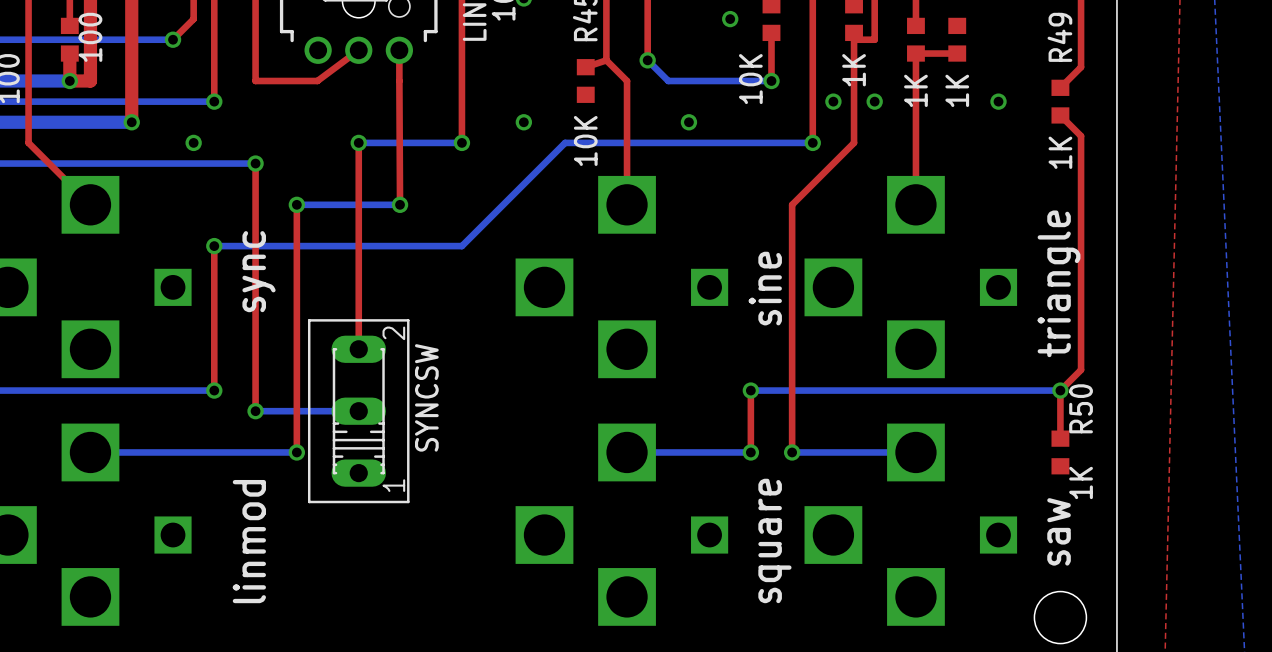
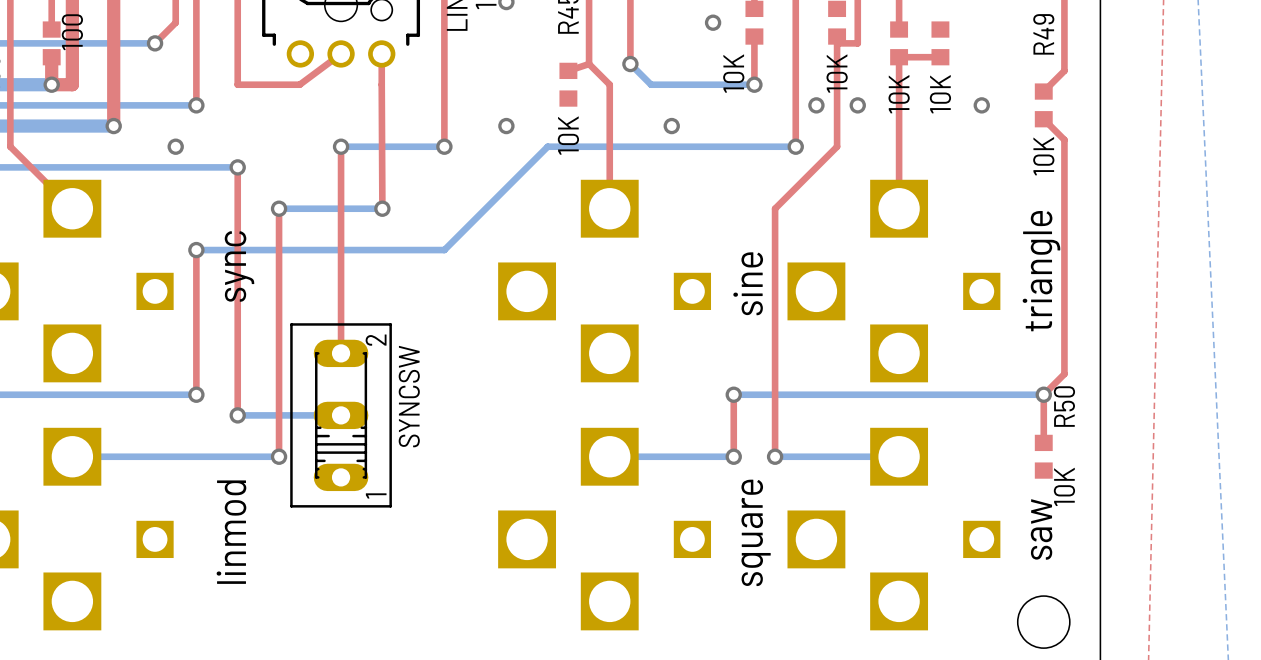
part value: 1K (854, 70) -> 10K (837, 73)
part value: 1K (915, 90) -> 10K (899, 94)
part value: 1K (957, 90) -> 10K (940, 94)
R49 value: 1K (1060, 152) -> 10K (1043, 156)
R50 value: 1K (1081, 482) -> 10K (1064, 486)

